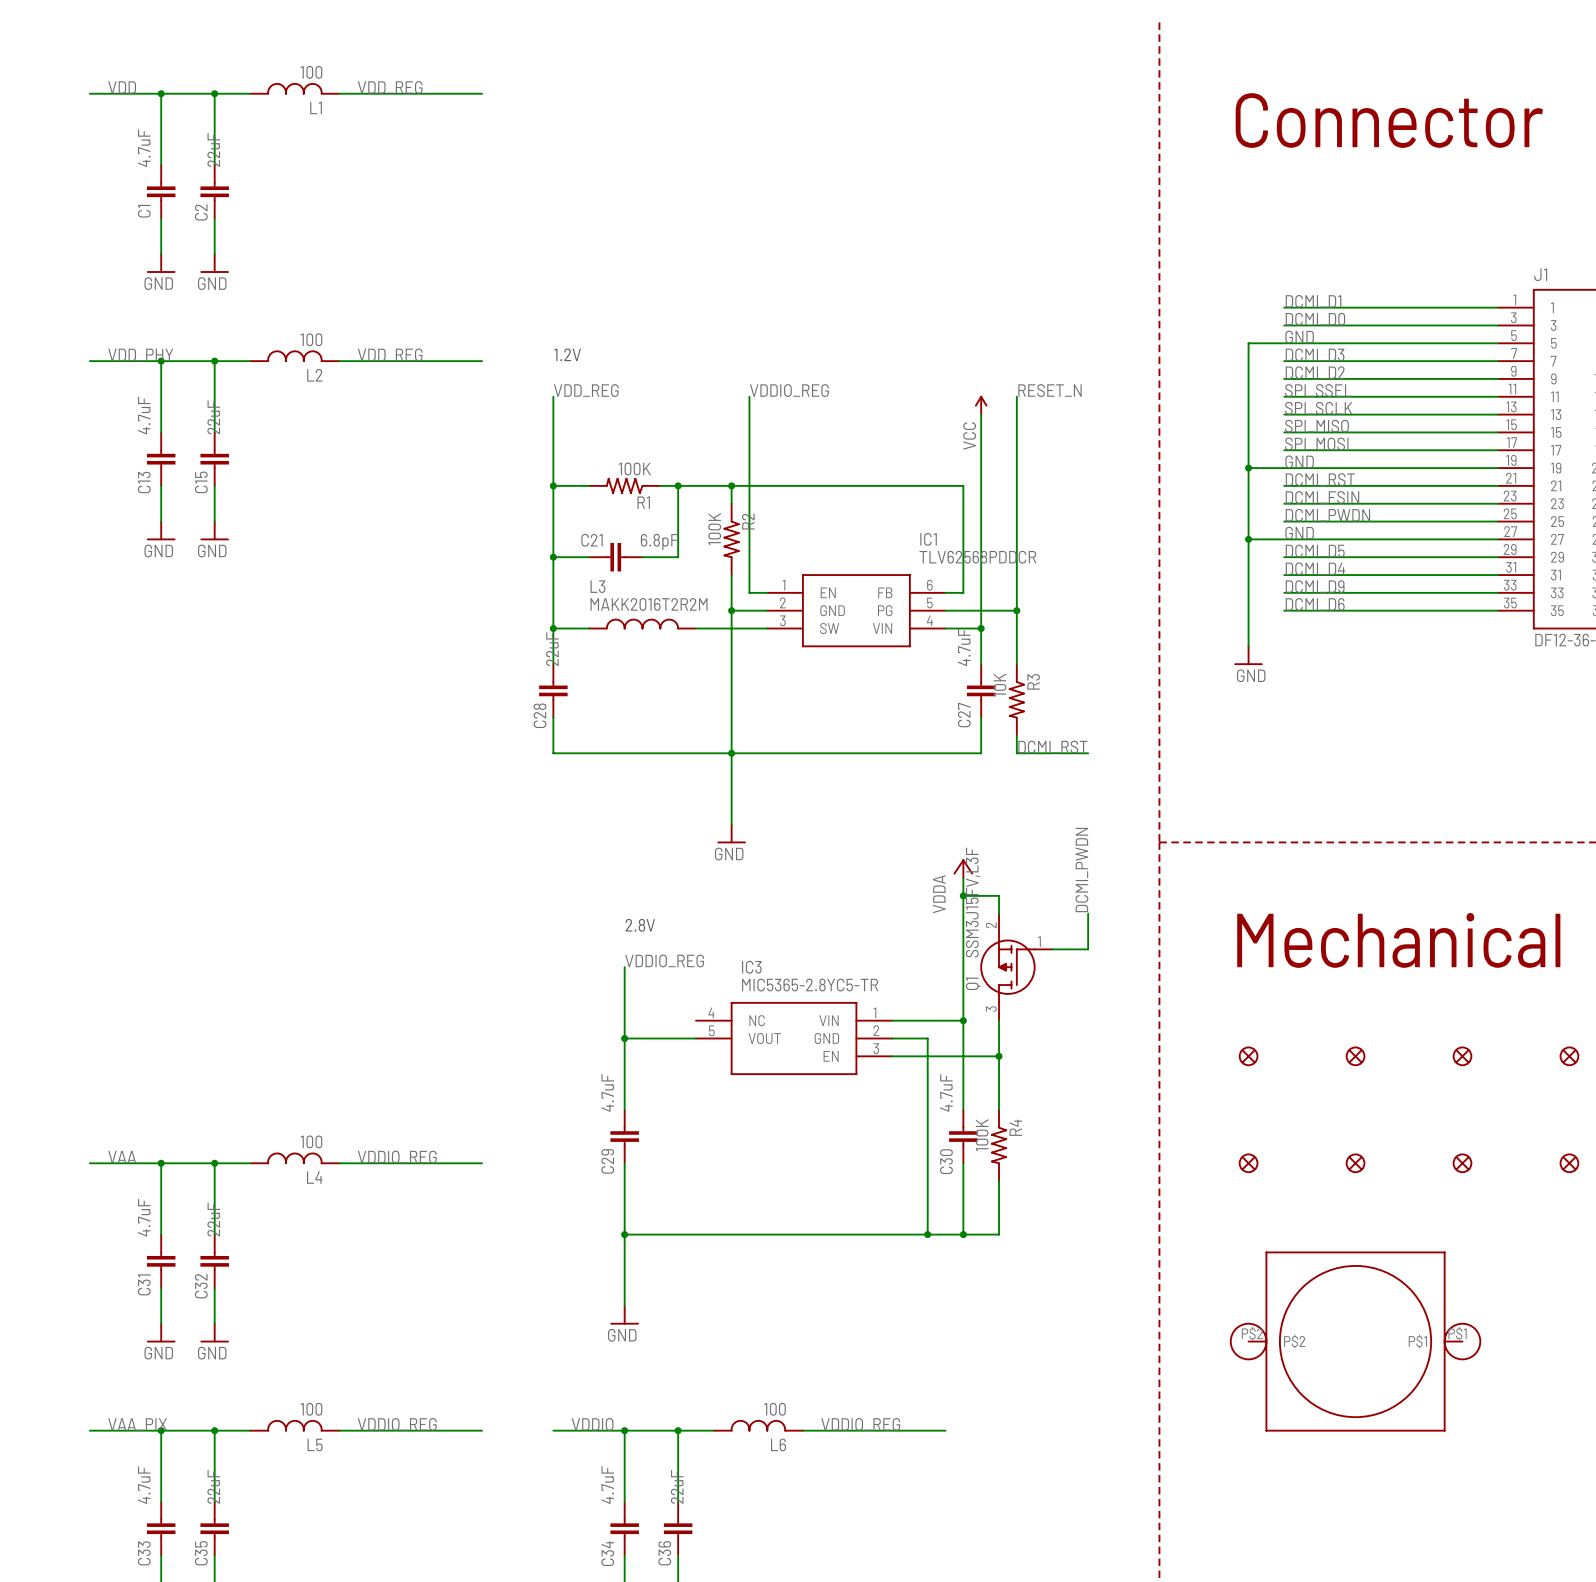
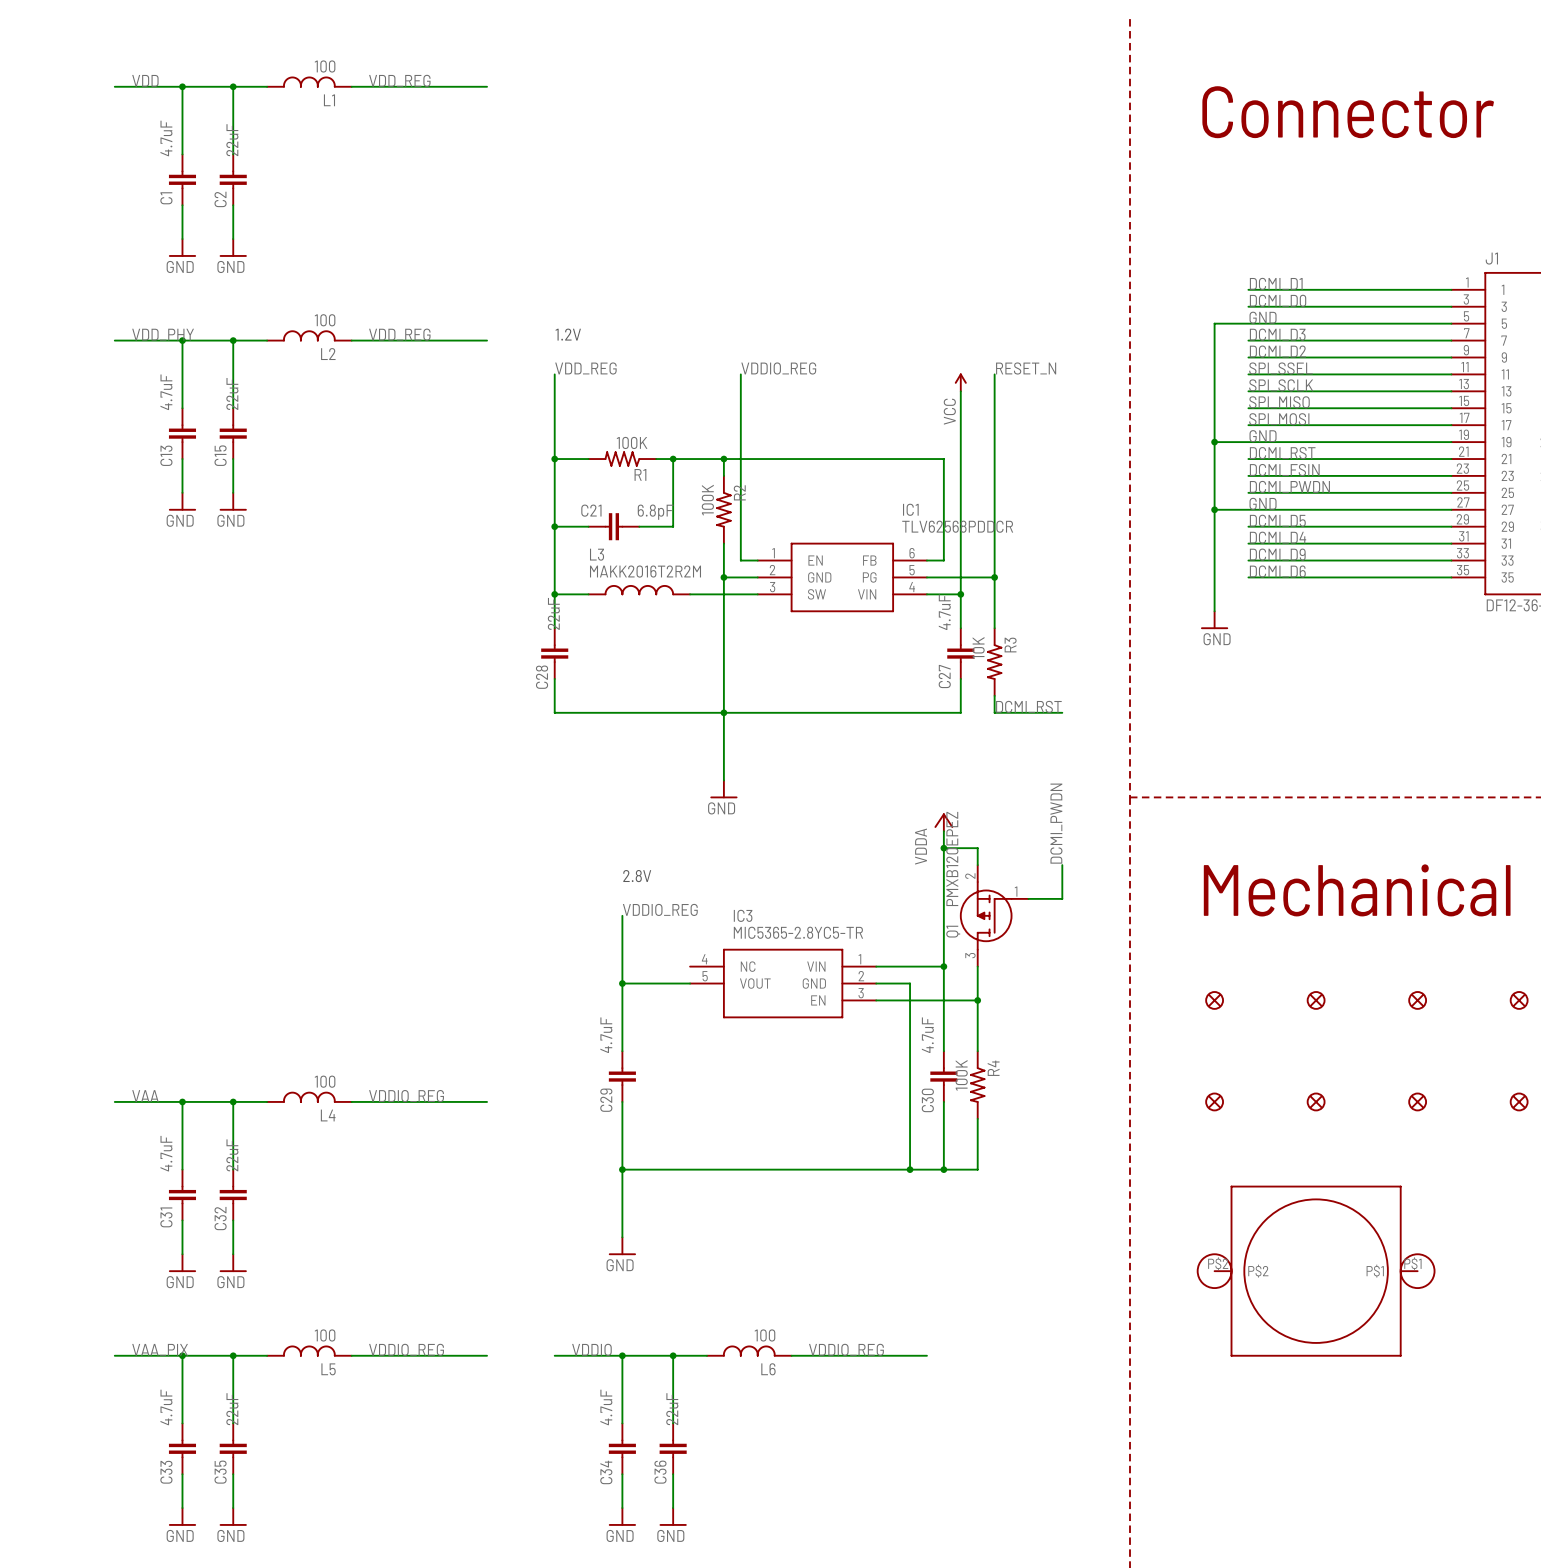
Q1 value: SSM3J15FV,L3F (972, 902) -> PMXB120EPEZ (952, 858)

